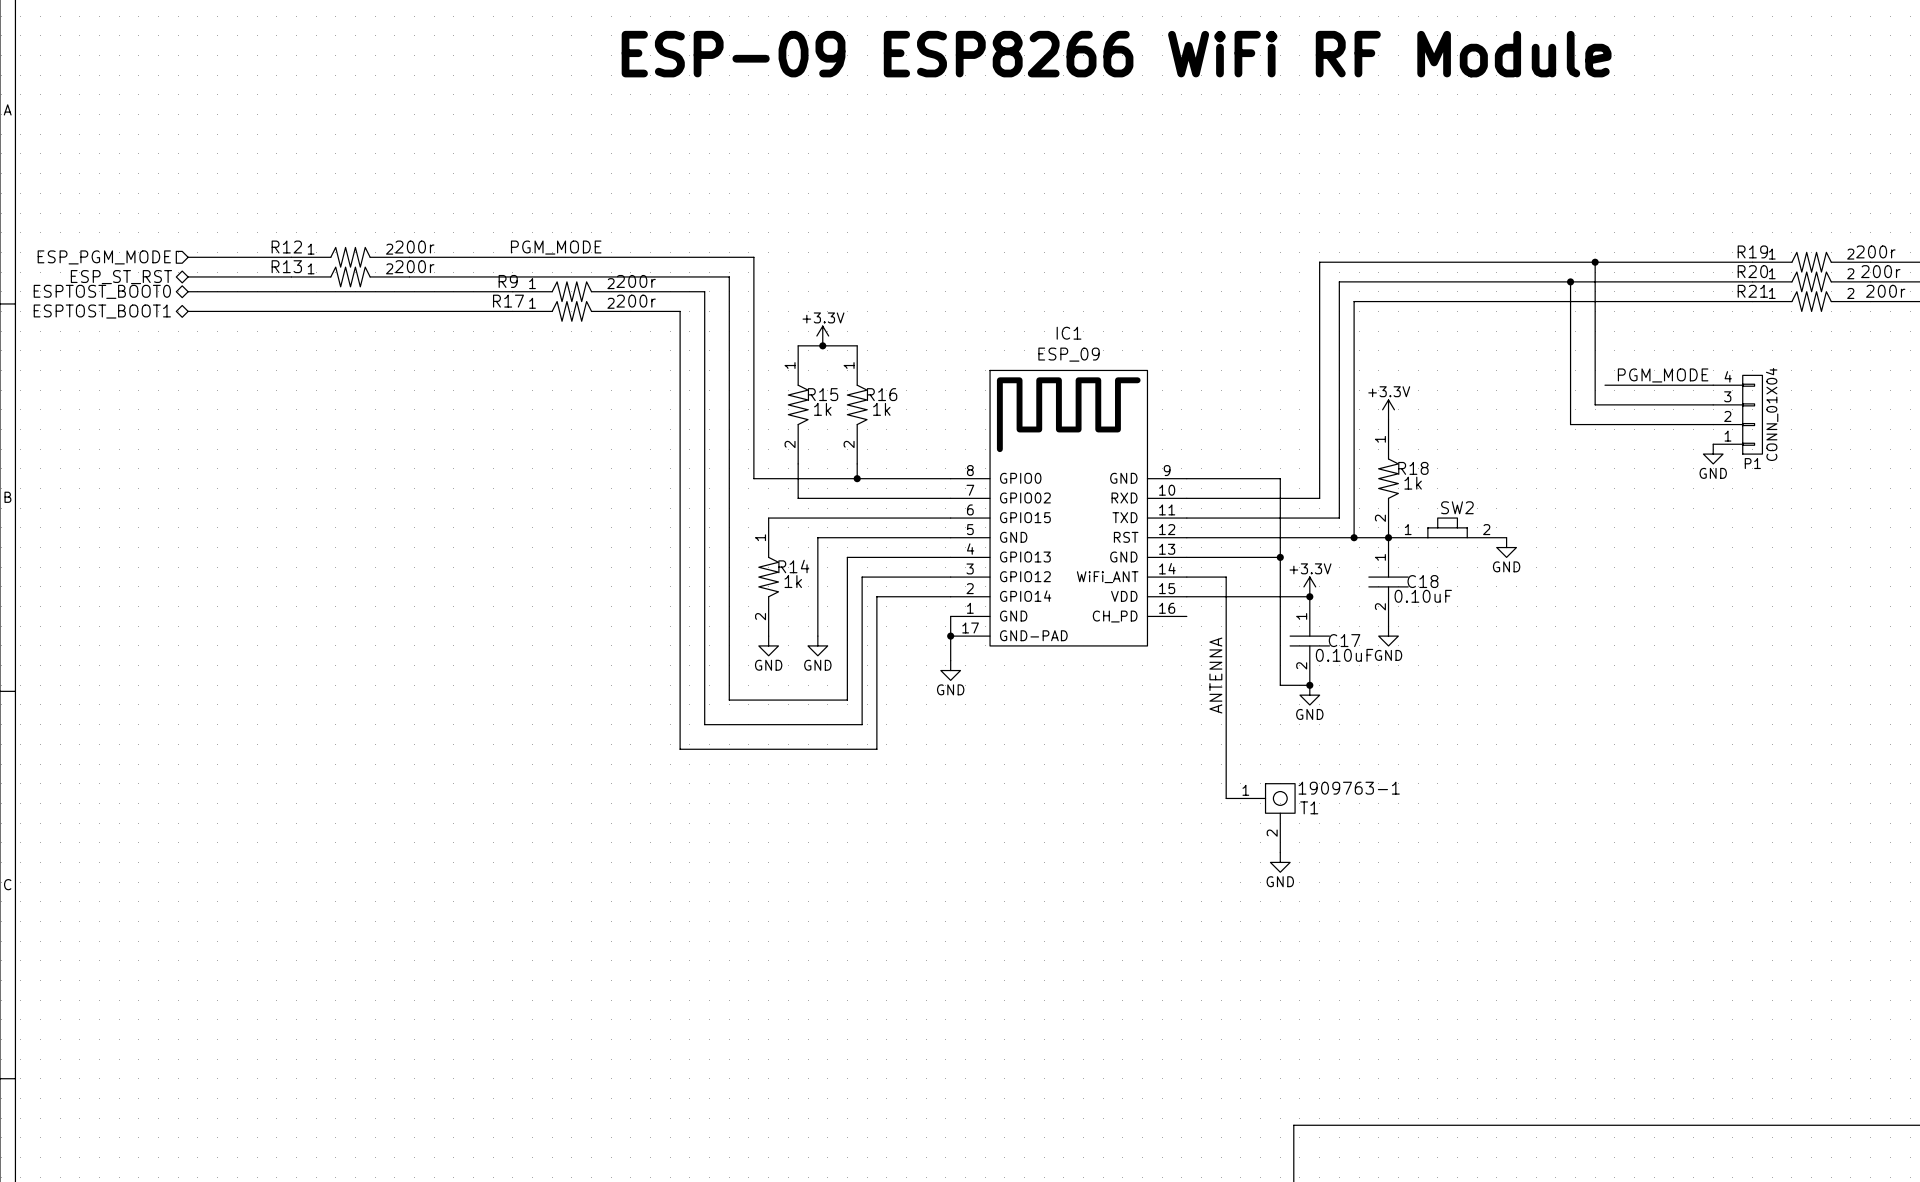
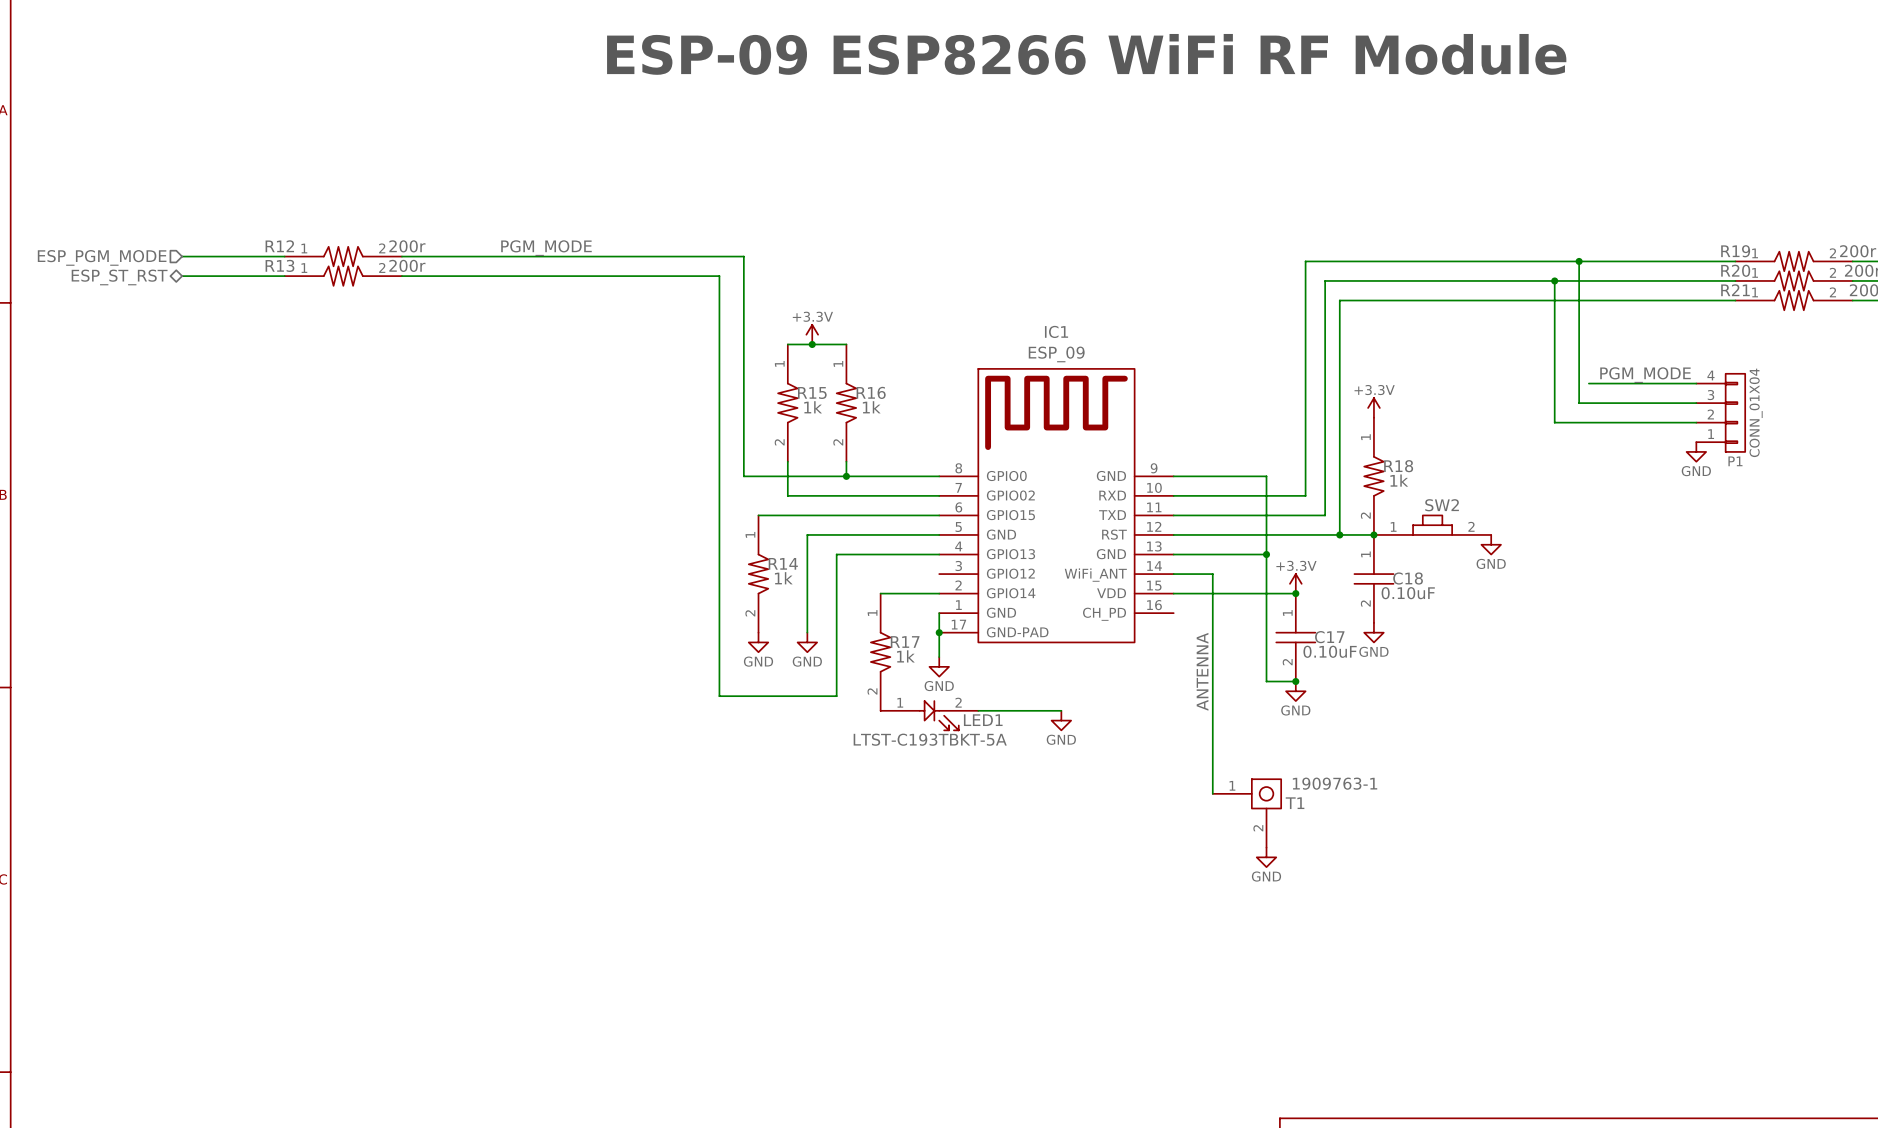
hierarchical label: ESPTOST_BOOT0 (102, 291) -> none
wire: (188, 291) (512, 291) -> none
R9: (571, 291) -> none
wire: (630, 291) (704, 291) (704, 724) (862, 724) (862, 577) (950, 577) -> none
R17 name position: R17 (508, 301) -> R17 (905, 642)
R17 text: 200r (636, 301) -> 1k (905, 656)
hierarchical label: ESPTOST_BOOT1 (102, 311) -> none
wire: (188, 311) (512, 311) -> none
R17 rotation: 0° (571, 311) -> 90° clockwise (880, 652)
R17 position: (571, 311) -> (880, 652)
wire: (630, 311) (680, 311) (680, 749) (876, 749) (876, 596) (891, 596) -> none
wire: none -> (978, 710) (1061, 710)
LED1: none -> LTST-C193TBKT-5A (929, 715)
power symbol: none -> GND (1061, 720)

